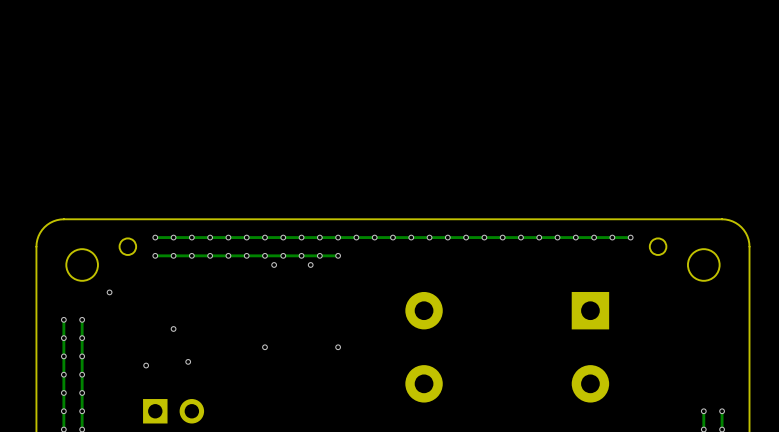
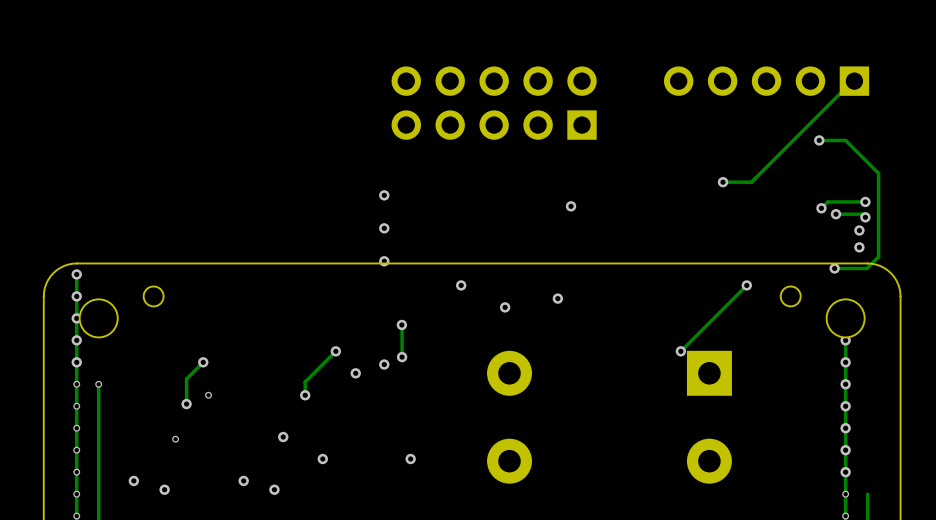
part: none -> (766, 81)
track: none -> (854, 81) (751, 182) (723, 182)
part: none -> (494, 103)
track: none -> (819, 140) (845, 140) (878, 173) (878, 256) (866, 268) (834, 268)
via: none -> (819, 140)
via: none -> (723, 182)
via: none -> (384, 195)
track: none -> (865, 201) (827, 201) (821, 208)
via: none -> (865, 201)
via: none -> (571, 206)
via: none -> (821, 208)
track: none -> (835, 214) (862, 214) (865, 217)
via: none -> (835, 214)
via: none -> (865, 217)
via: none -> (384, 228)
via: none -> (859, 230)
via: none -> (859, 247)
via: none -> (384, 261)
via: none -> (834, 268)
track: none -> (76, 274) (76, 384)
via: none -> (76, 274)
via: (155, 237) -> none
via: (173, 237) -> none
via: (191, 237) -> none
via: (210, 237) -> none
via: (228, 237) -> none
via: (246, 237) -> none
via: (264, 237) -> none
via: (283, 237) -> none
via: (301, 237) -> none
via: (319, 237) -> none
via: (338, 237) -> none
via: (356, 237) -> none
via: (374, 237) -> none
via: none -> (461, 285)
via: (392, 237) -> none
via: (411, 237) -> none
via: (429, 237) -> none
via: (447, 237) -> none
via: (466, 237) -> none
via: (484, 237) -> none
via: (502, 237) -> none
via: (520, 237) -> none
via: (539, 237) -> none
via: (557, 237) -> none
via: (575, 237) -> none
via: (594, 237) -> none
via: (612, 237) -> none
track: none -> (746, 285) (680, 351)
via: none -> (746, 285)
track: (630, 237) (155, 237) -> none
via: (630, 237) -> none
via: none -> (76, 296)
via: none -> (557, 298)
via: (155, 255) -> none
via: (173, 255) -> none
via: (191, 255) -> none
via: (210, 255) -> none
via: (228, 255) -> none
via: (246, 255) -> none
via: (264, 255) -> none
via: (283, 255) -> none
via: (301, 255) -> none
via: (319, 255) -> none
track: (338, 255) (155, 255) -> none
via: (338, 255) -> none
via: none -> (505, 307)
via: none -> (76, 318)
via: (274, 264) -> none
via: (310, 264) -> none
track: none -> (845, 318) (845, 494)
track: none -> (402, 325) (402, 357)
via: none -> (401, 324)
via: none -> (76, 340)
via: none -> (845, 340)
via: (109, 292) -> none
track: none -> (335, 351) (305, 381) (305, 395)
via: none -> (335, 351)
via: none -> (680, 351)
via: none -> (402, 357)
via: none -> (76, 362)
track: none -> (203, 362) (186, 379) (186, 404)
via: none -> (203, 362)
via: none -> (845, 362)
via: none -> (384, 364)
via: none -> (355, 373)
via: none -> (845, 384)
via: none -> (305, 395)
via: none -> (186, 404)
via: (82, 338) -> none
via: none -> (845, 406)
via: (264, 347) -> none
via: (338, 347) -> none
via: (82, 356) -> none
via: none -> (845, 428)
via: (188, 361) -> none
via: none -> (283, 437)
via: (82, 374) -> none
via: none -> (845, 450)
via: none -> (322, 458)
via: none -> (410, 458)
via: (82, 392) -> none
via: none -> (845, 472)
via: none -> (133, 480)
via: none -> (243, 480)
via: none -> (164, 489)
via: none -> (274, 489)
via: (82, 411) -> none
part: (173, 411) -> none
via: (722, 411) -> none
via: (82, 429) -> none
via: (722, 429) -> none

